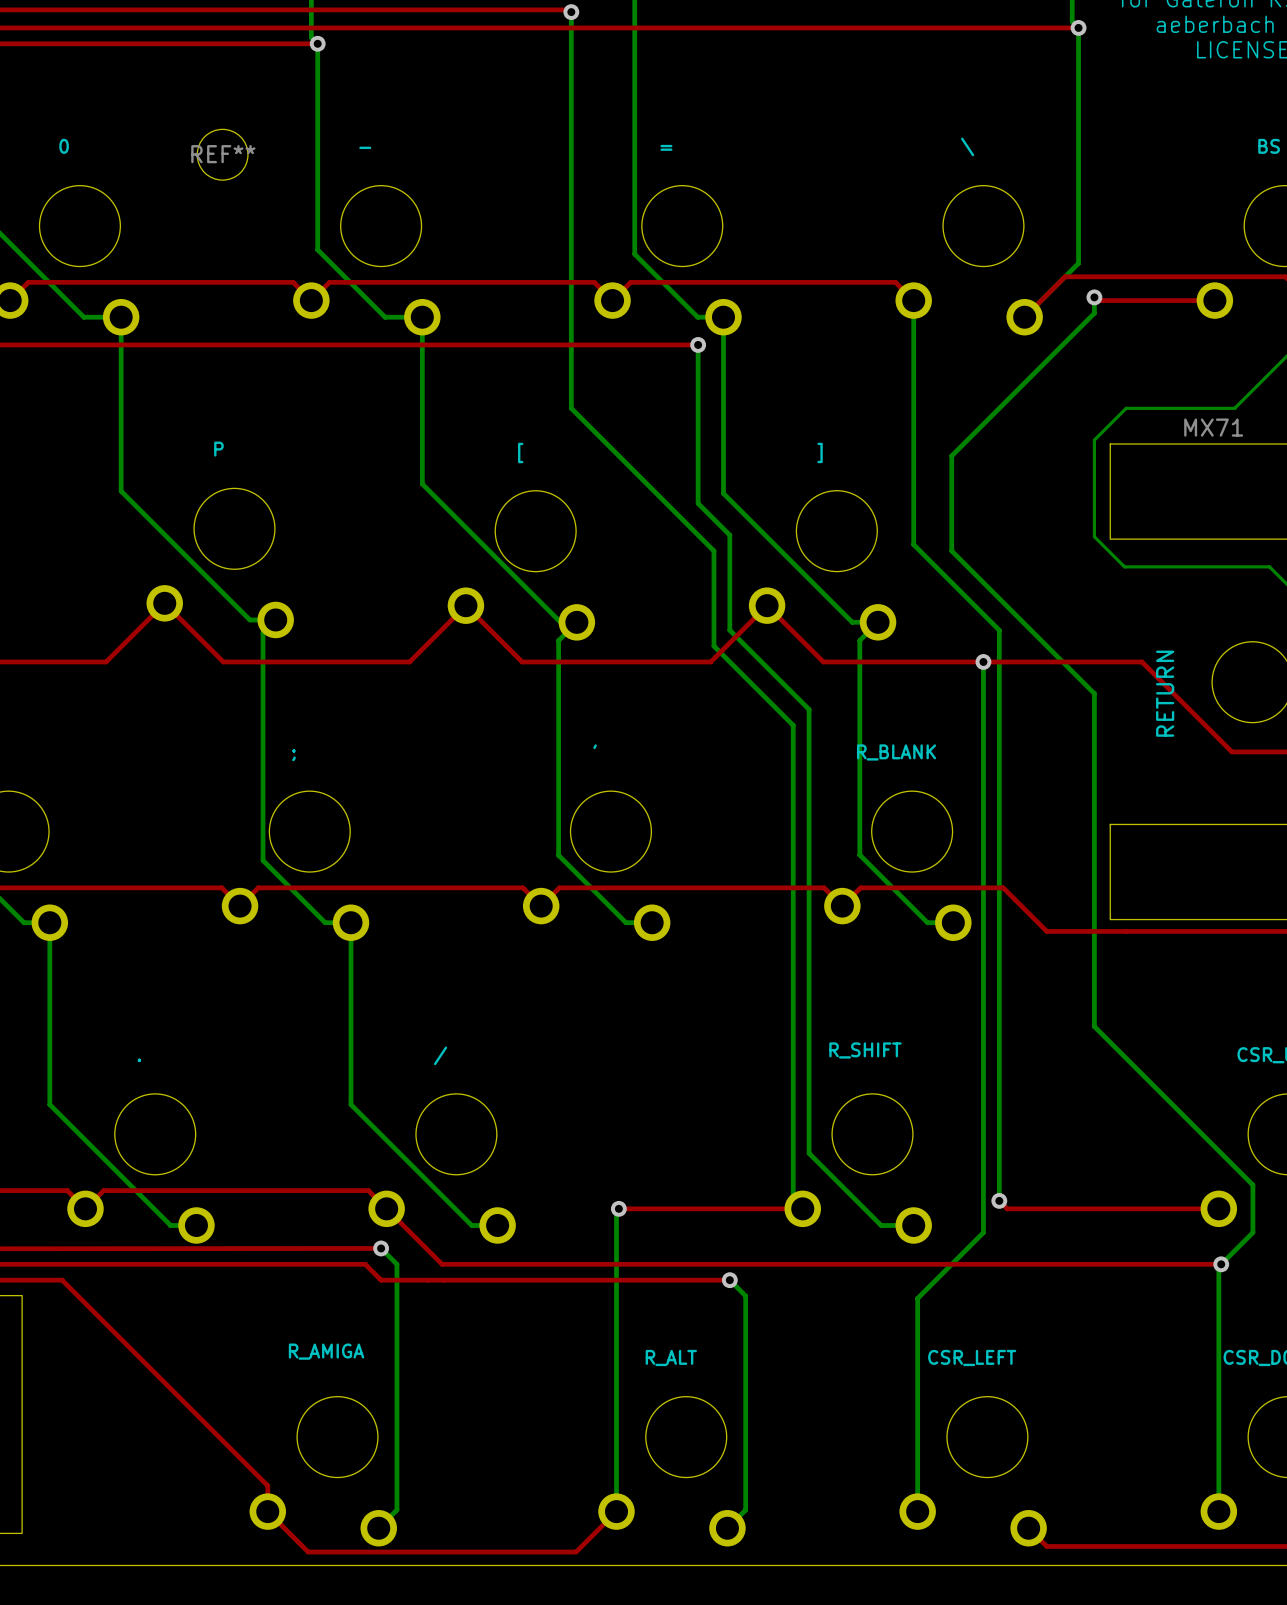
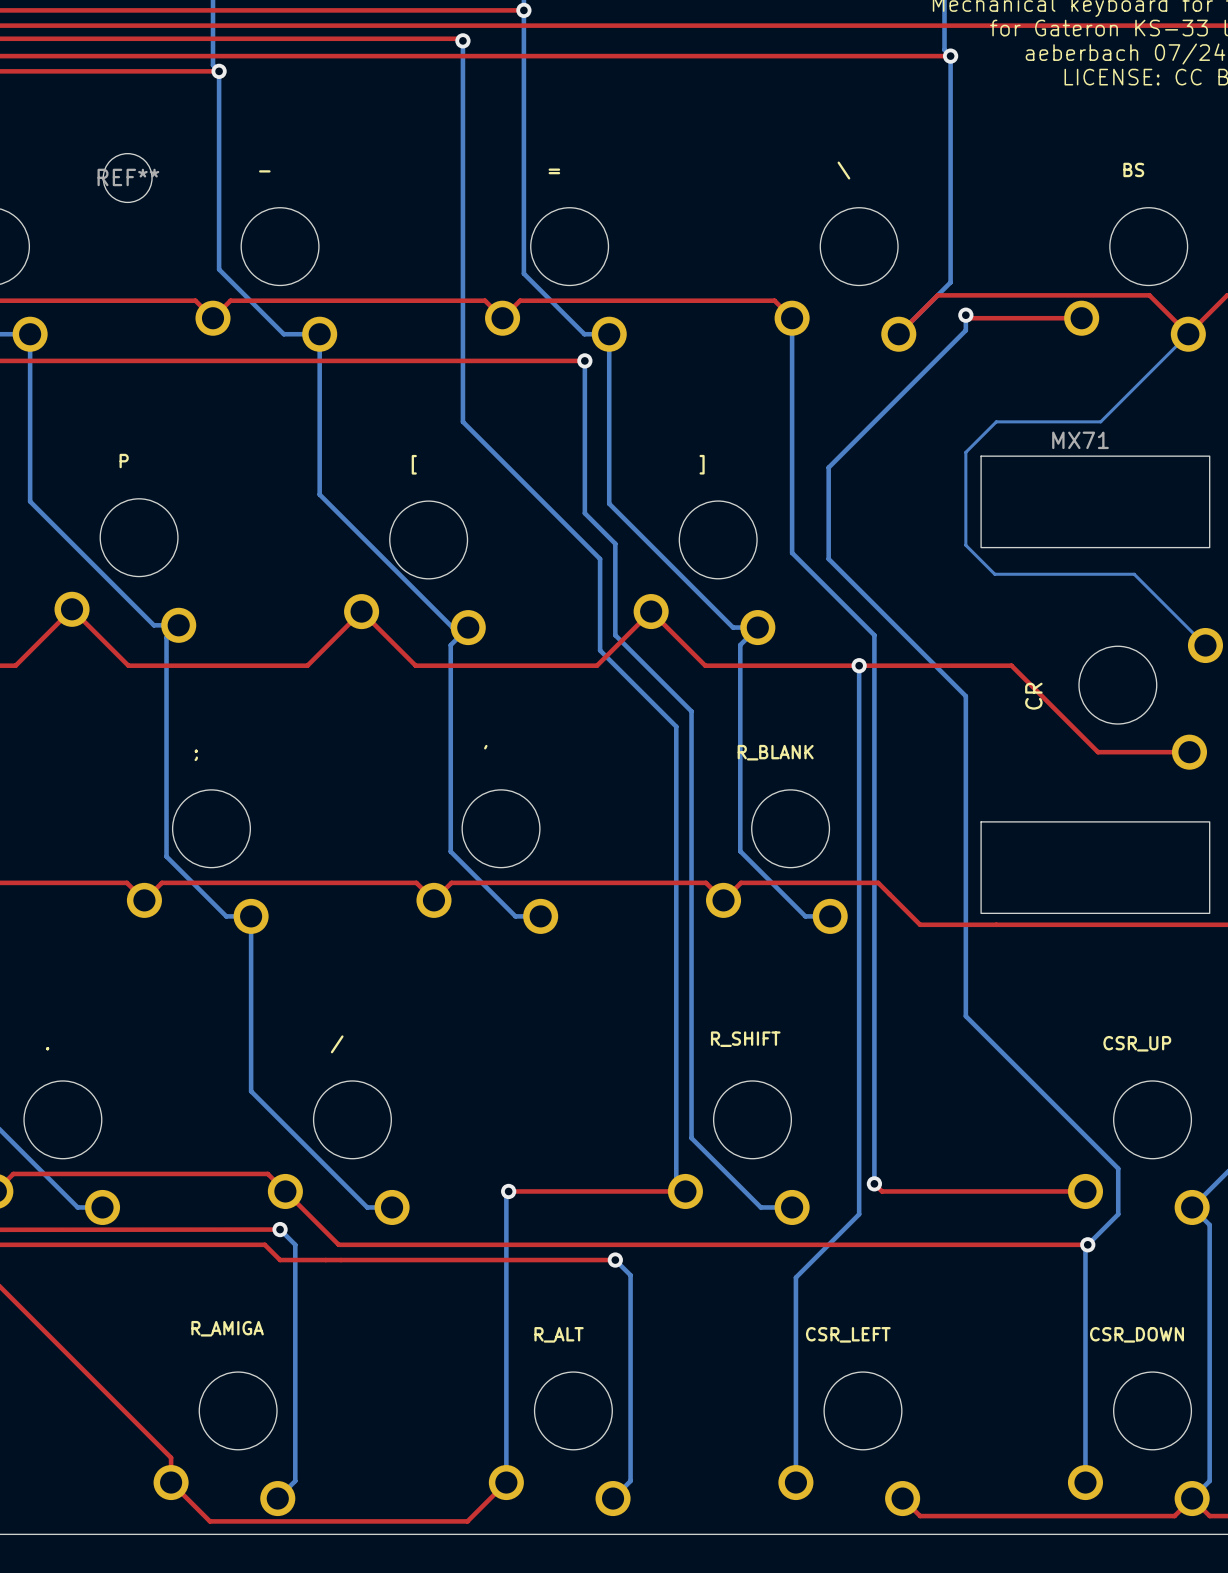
MX71 value: RETURN (1165, 693) -> CR (1033, 696)

